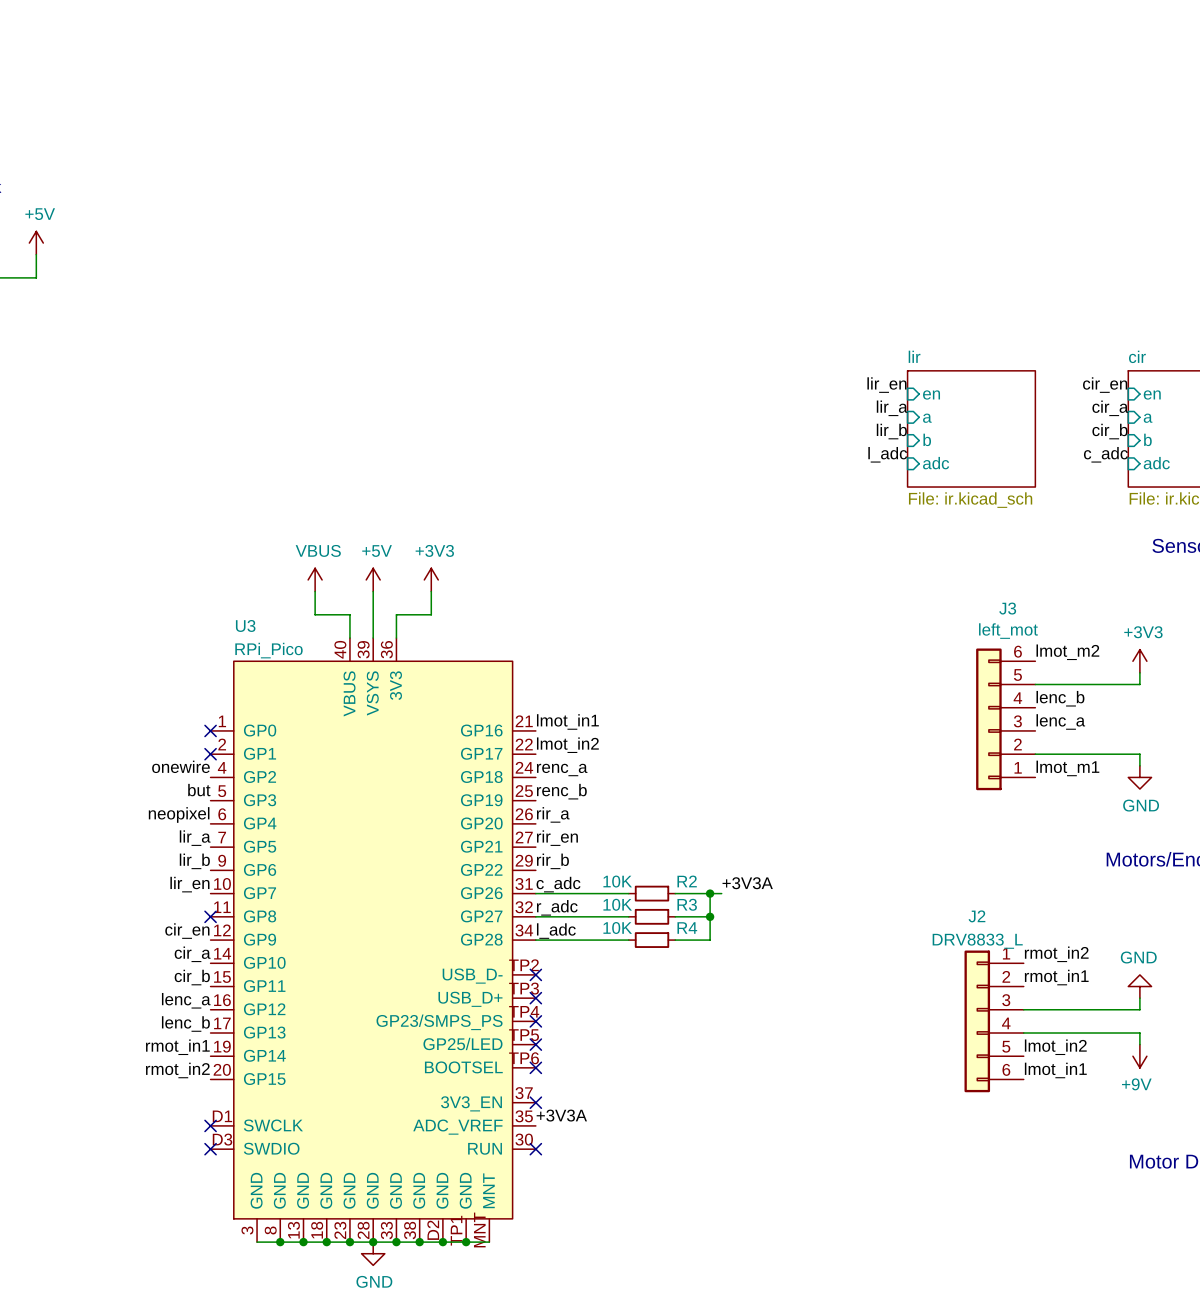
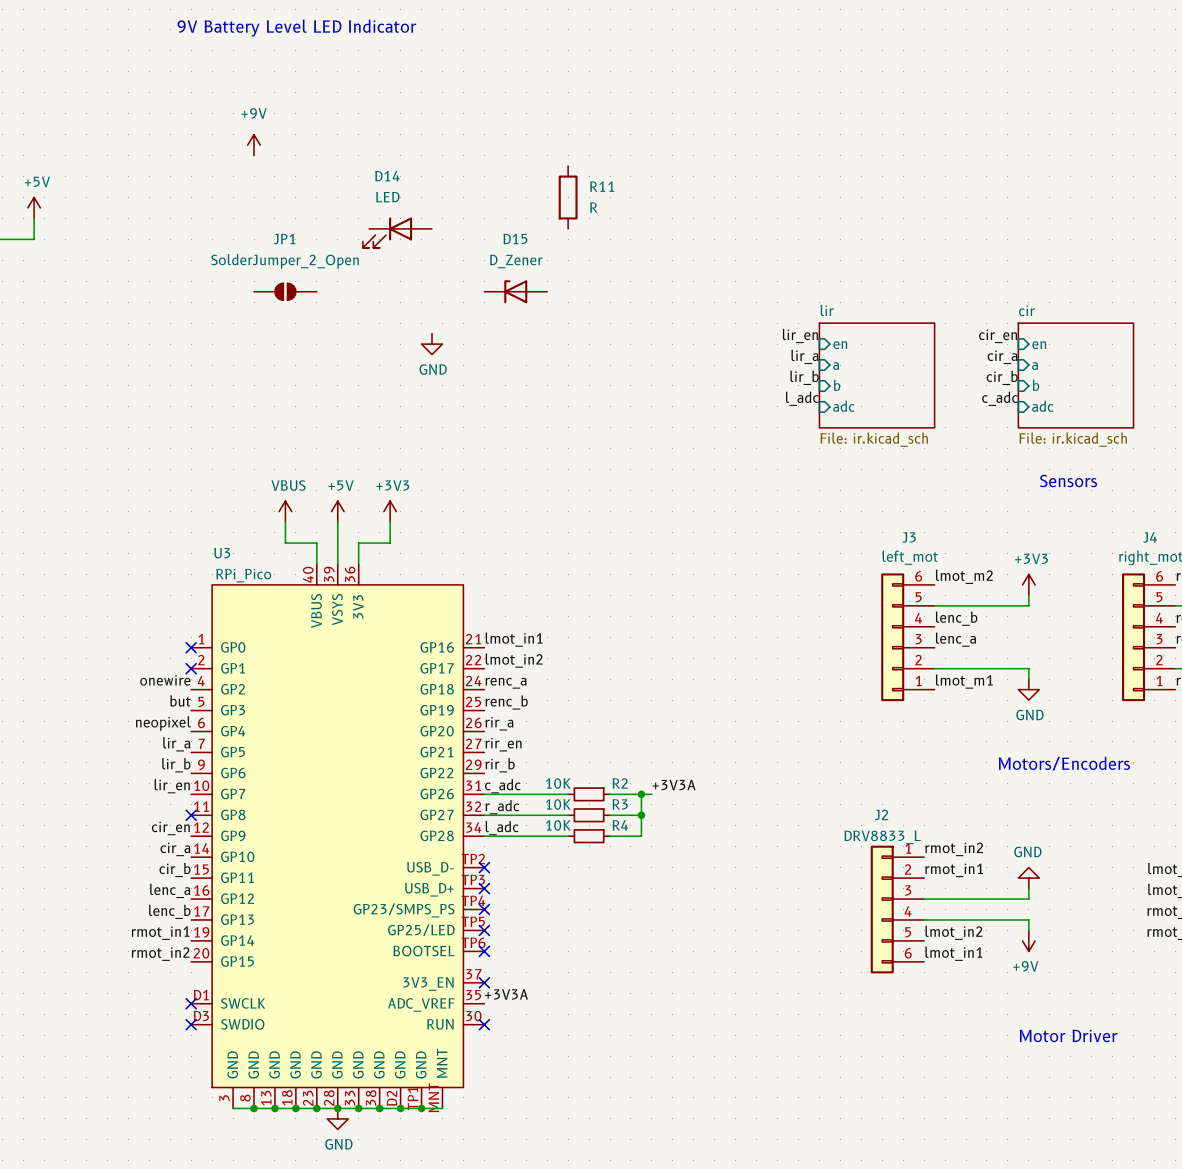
text: none -> 9V Battery Level LED Indicator (296, 28)
power symbol: none -> +9V (254, 145)
R11: none -> R (568, 197)
D14: none -> LED (397, 232)
JP1: none -> SolderJumper_2_Open (285, 291)
D15: none -> D_Zener (515, 291)
power symbol: none -> GND (432, 344)

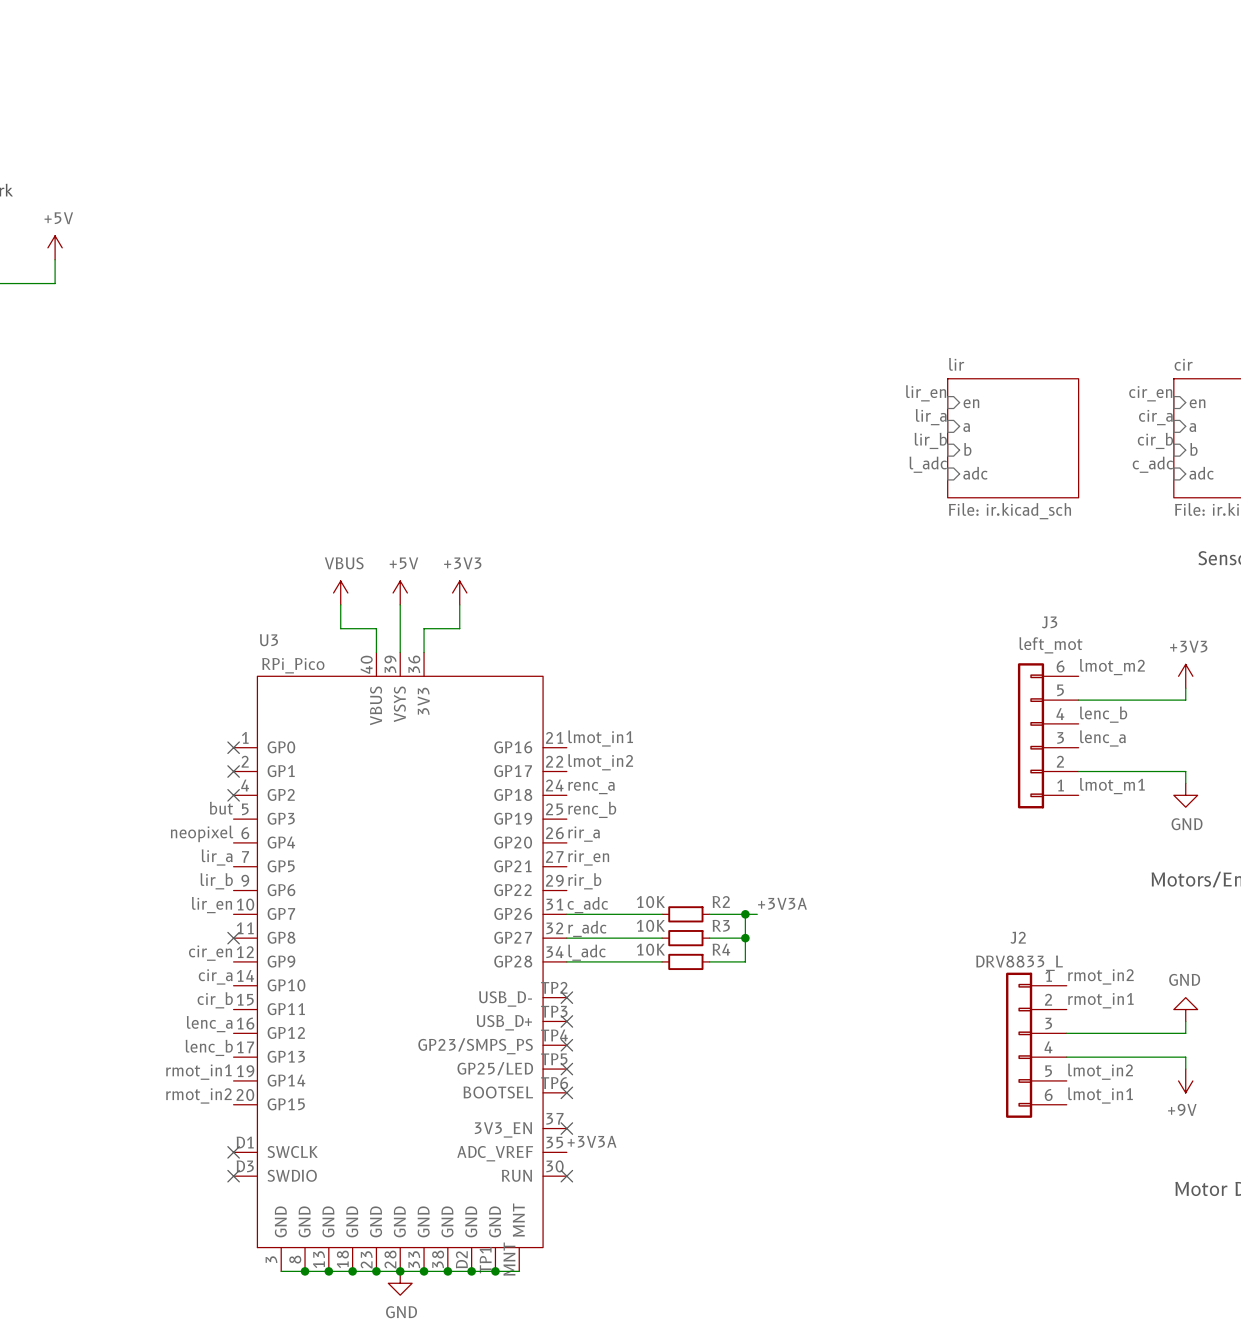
text: 9V Battery Level LED Indicator (296, 28) -> none
power symbol: +9V (254, 145) -> none
R11: R (568, 197) -> none
D14: LED (397, 232) -> none
JP1: SolderJumper_2_Open (285, 291) -> none
D15: D_Zener (515, 291) -> none
power symbol: GND (432, 344) -> none
label: onewire (165, 680) -> none
no-connect mark: none -> (233, 795)

